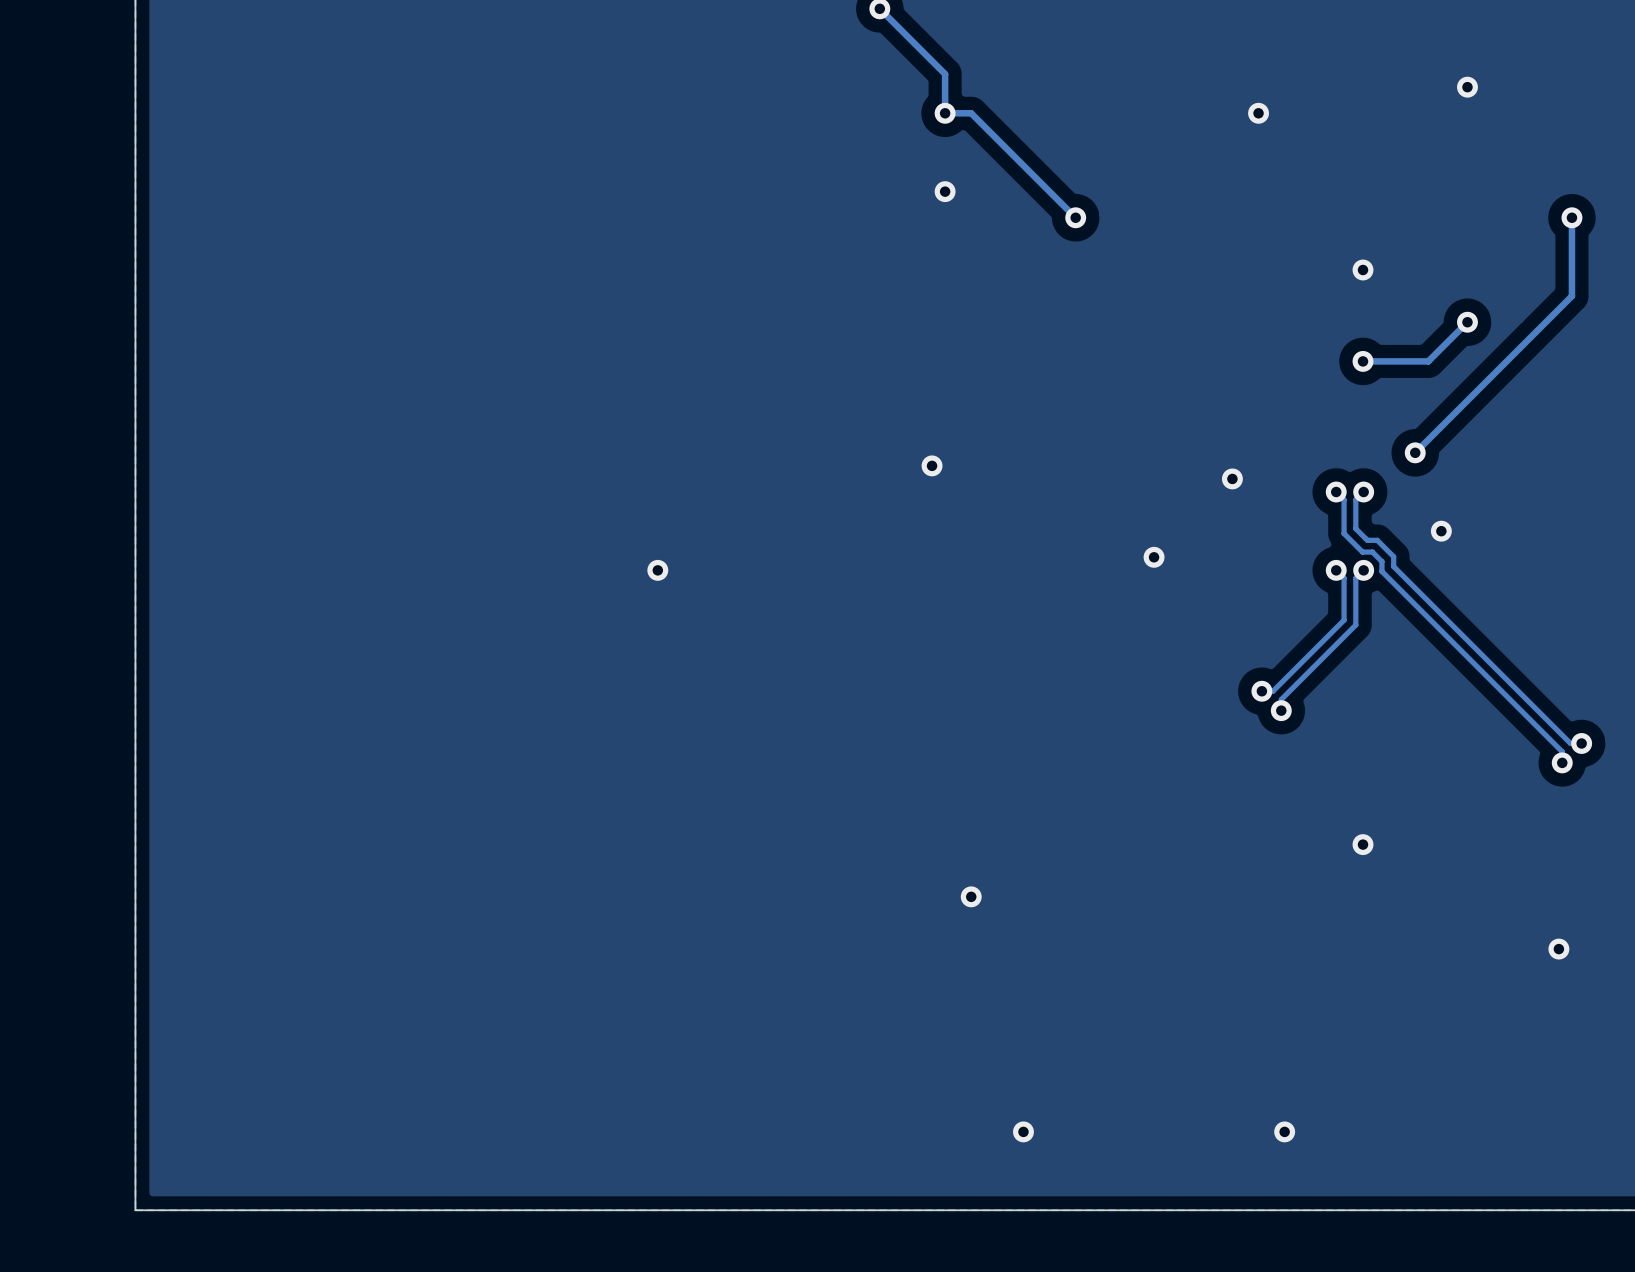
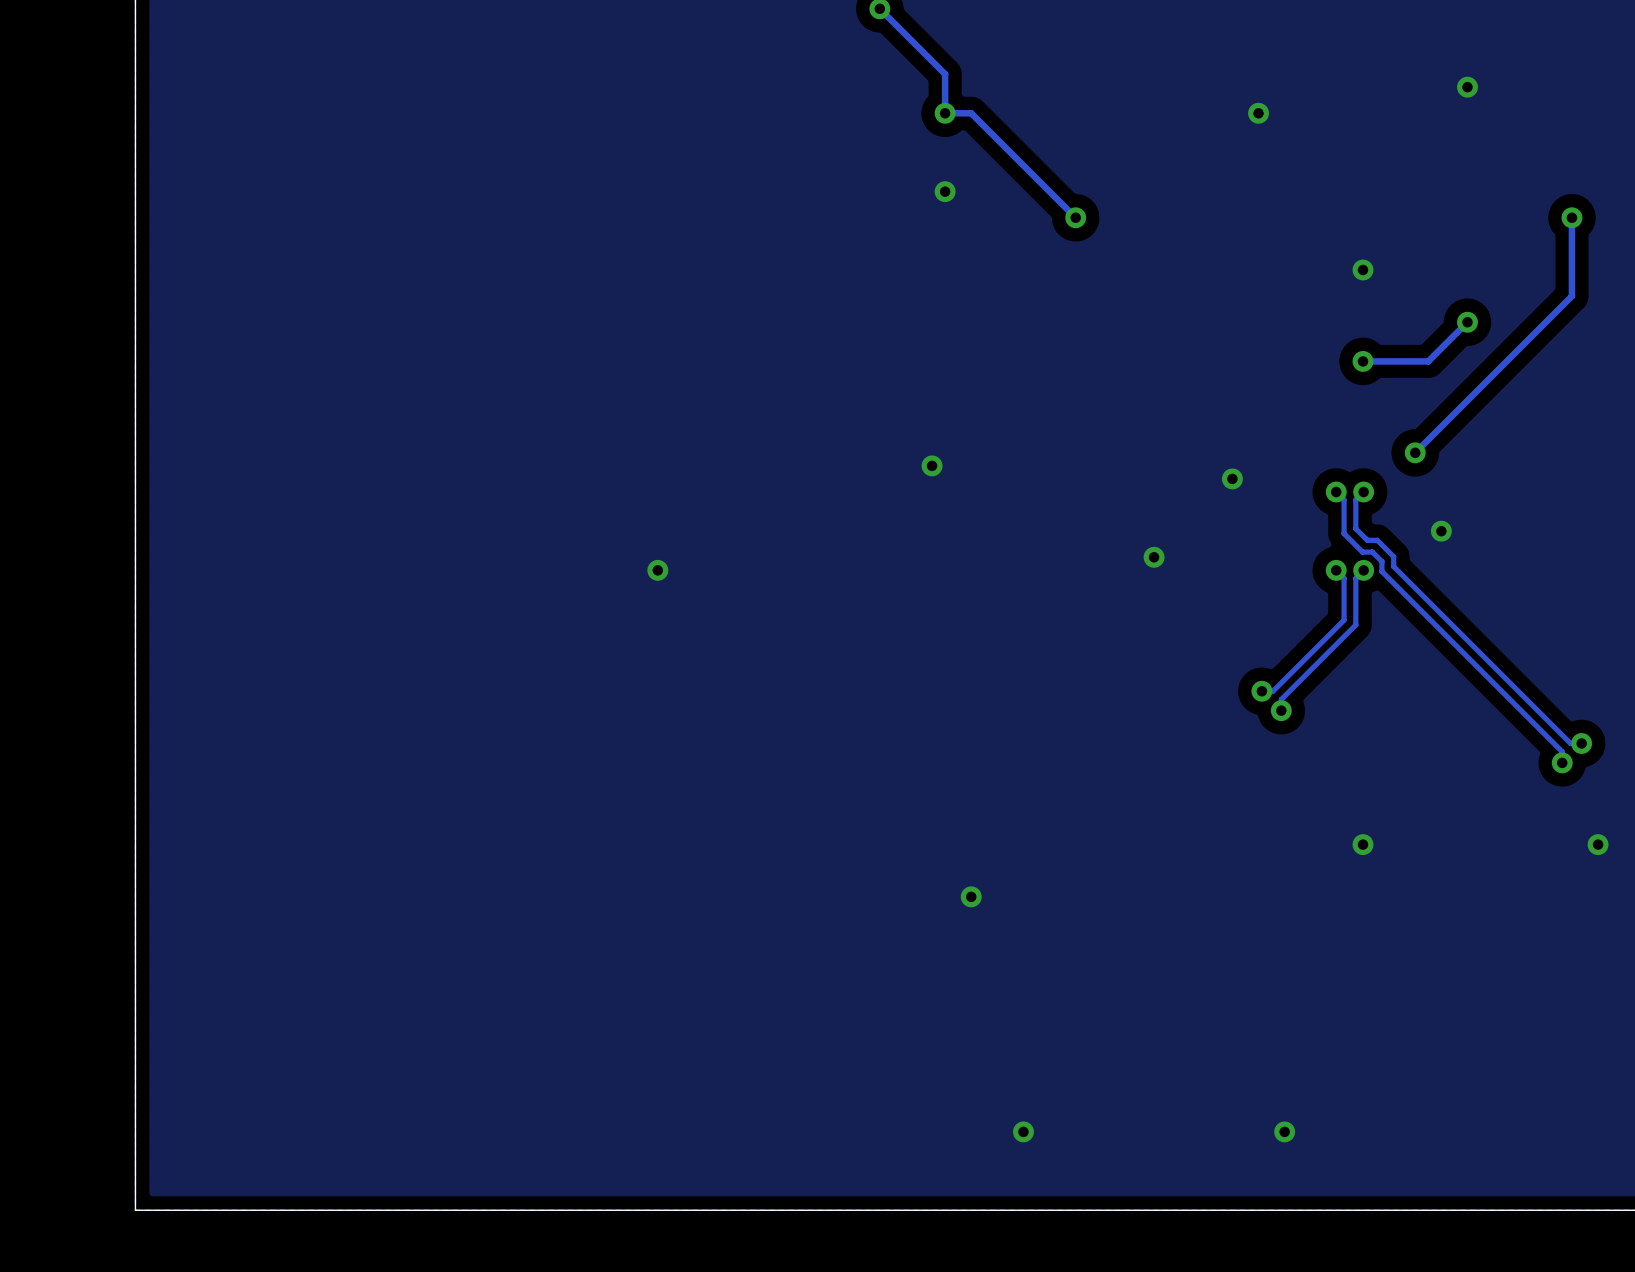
via position: (1558, 949) -> (1598, 844)

